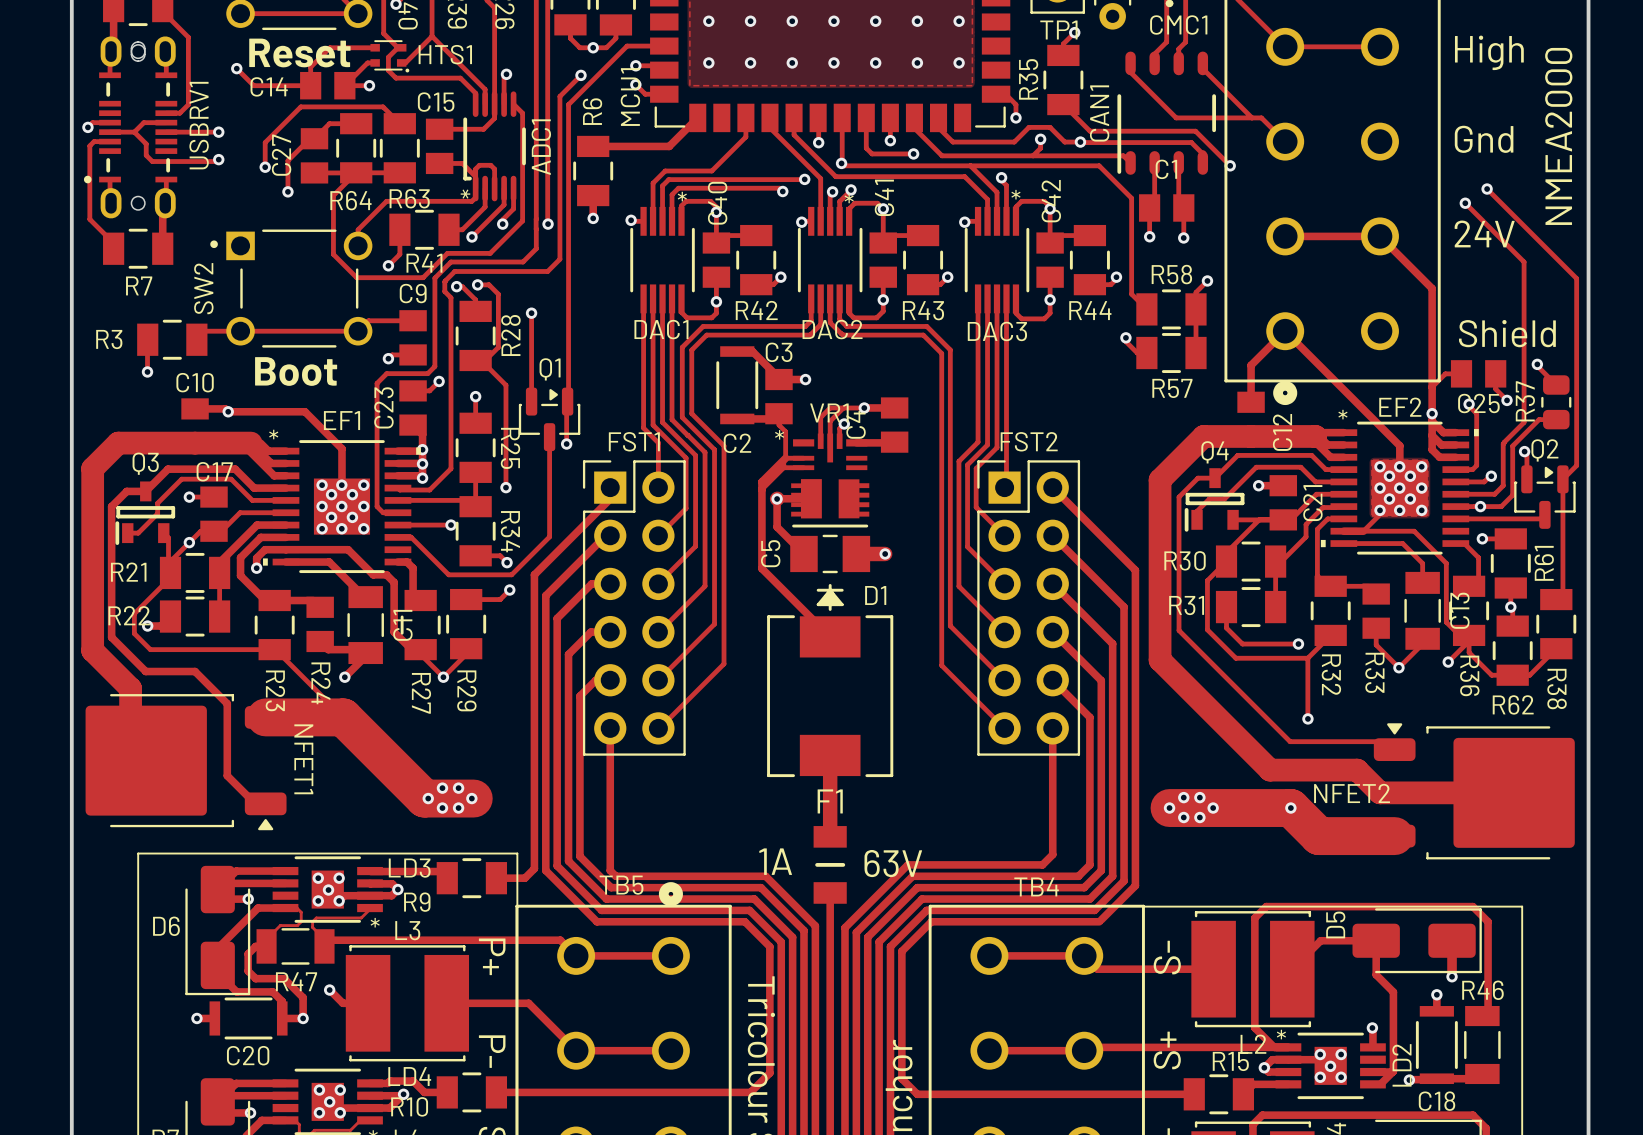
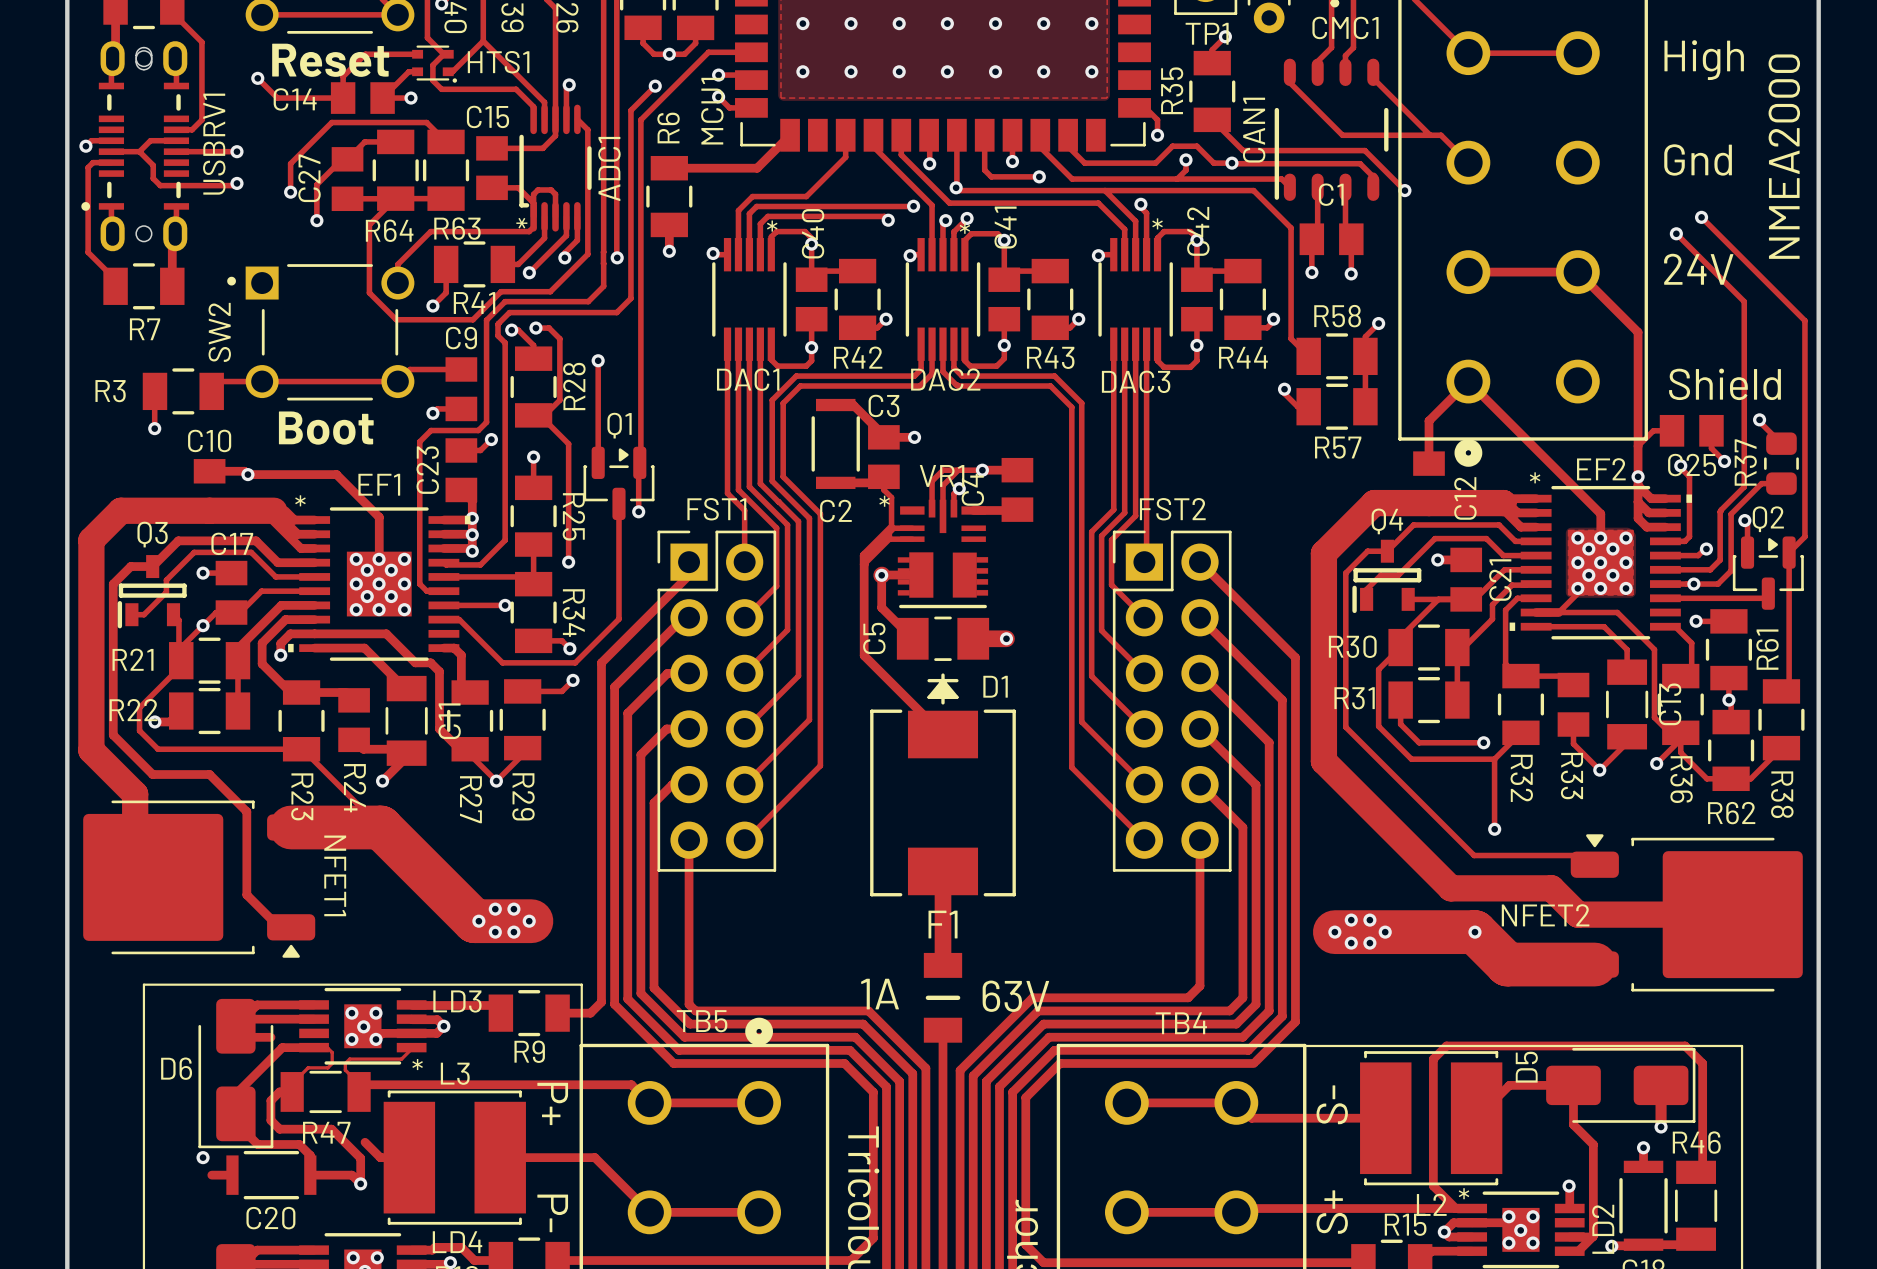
via: (248, 899) -> none
R9 name position: R9 (417, 902) -> R9 (529, 1051)
track: (284, 978) (303, 997) (303, 1018) -> (312, 1129) (331, 1129) (360, 1158) (360, 1183) (351, 1175) (334, 1175)
via: (329, 990) -> none
via position: (196, 1018) -> (203, 1157)
via: (303, 1018) -> none
via: none -> (360, 1183)

